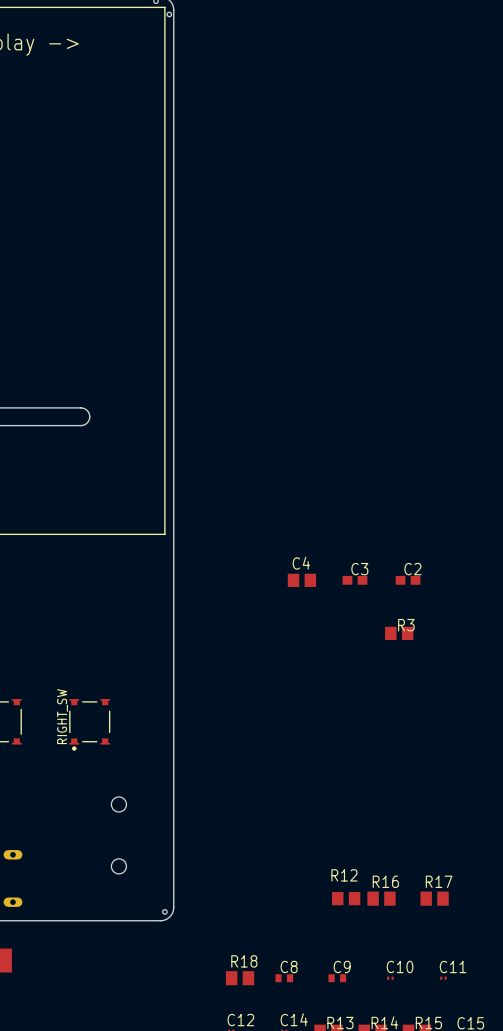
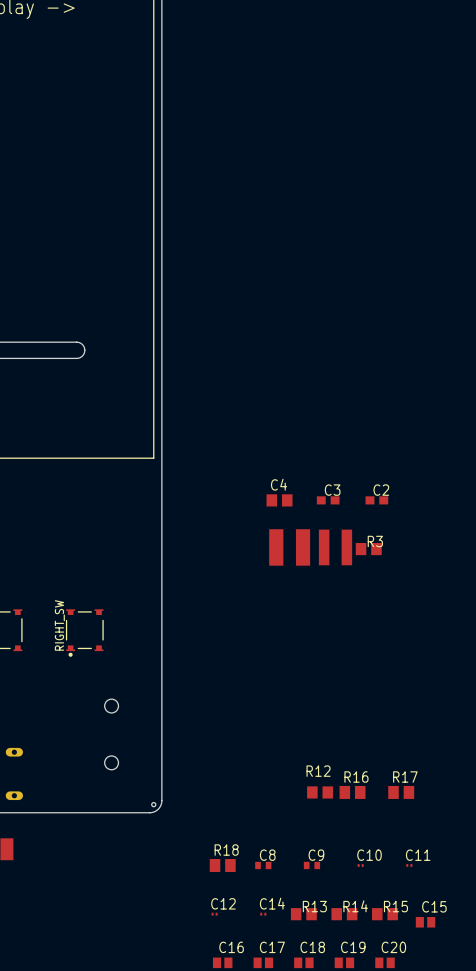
part: none -> (289, 547)
part: none -> (335, 547)

